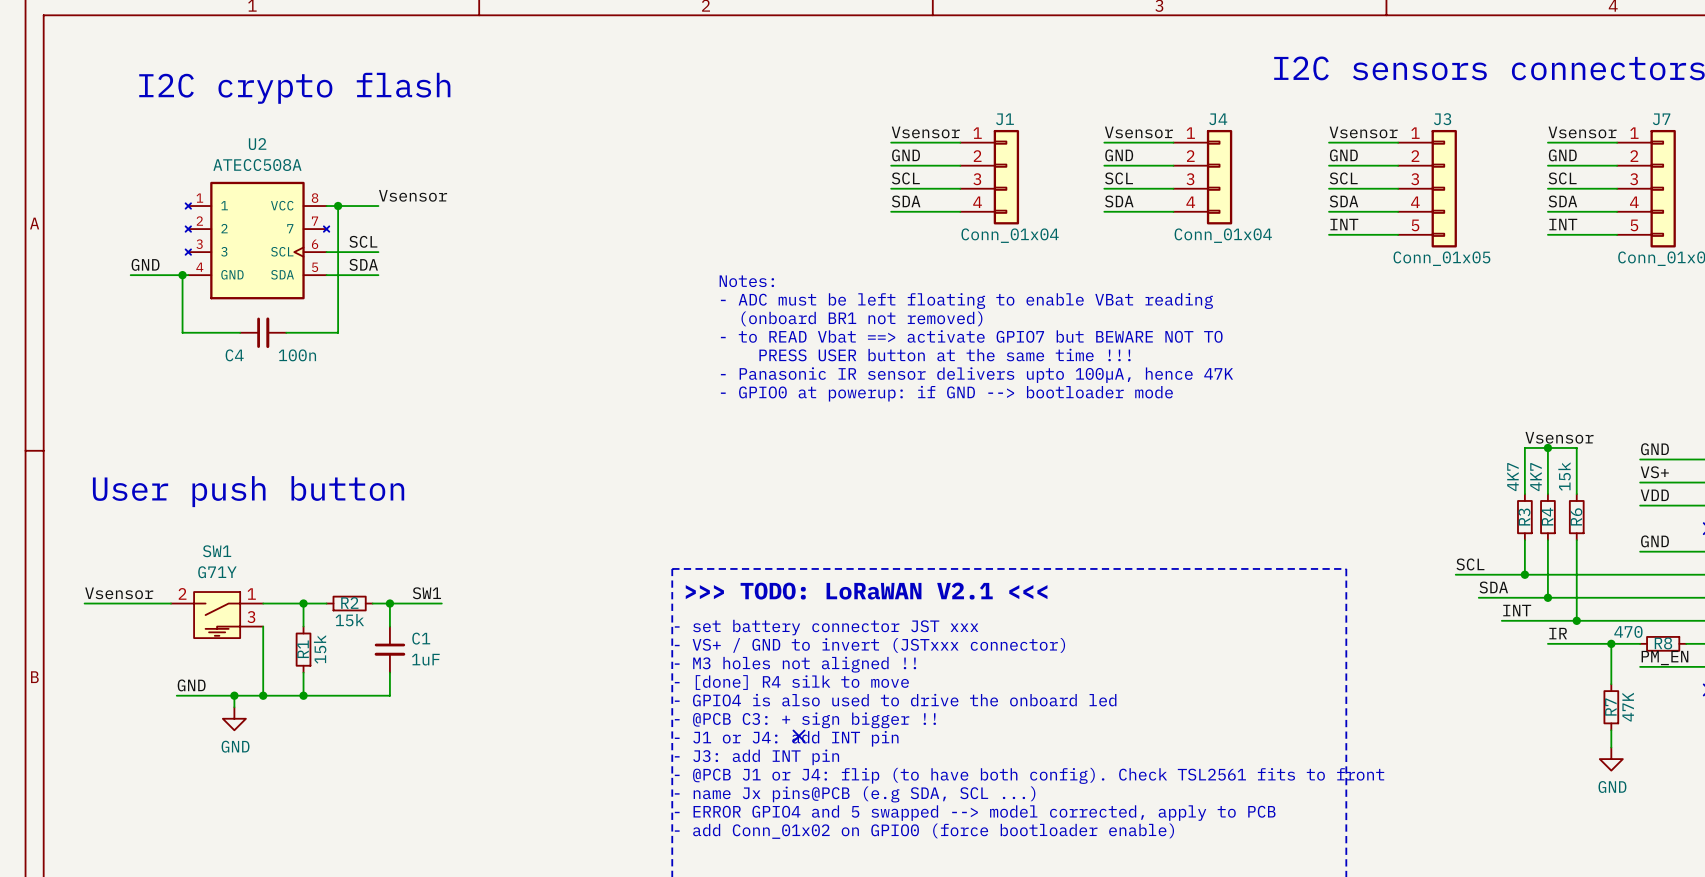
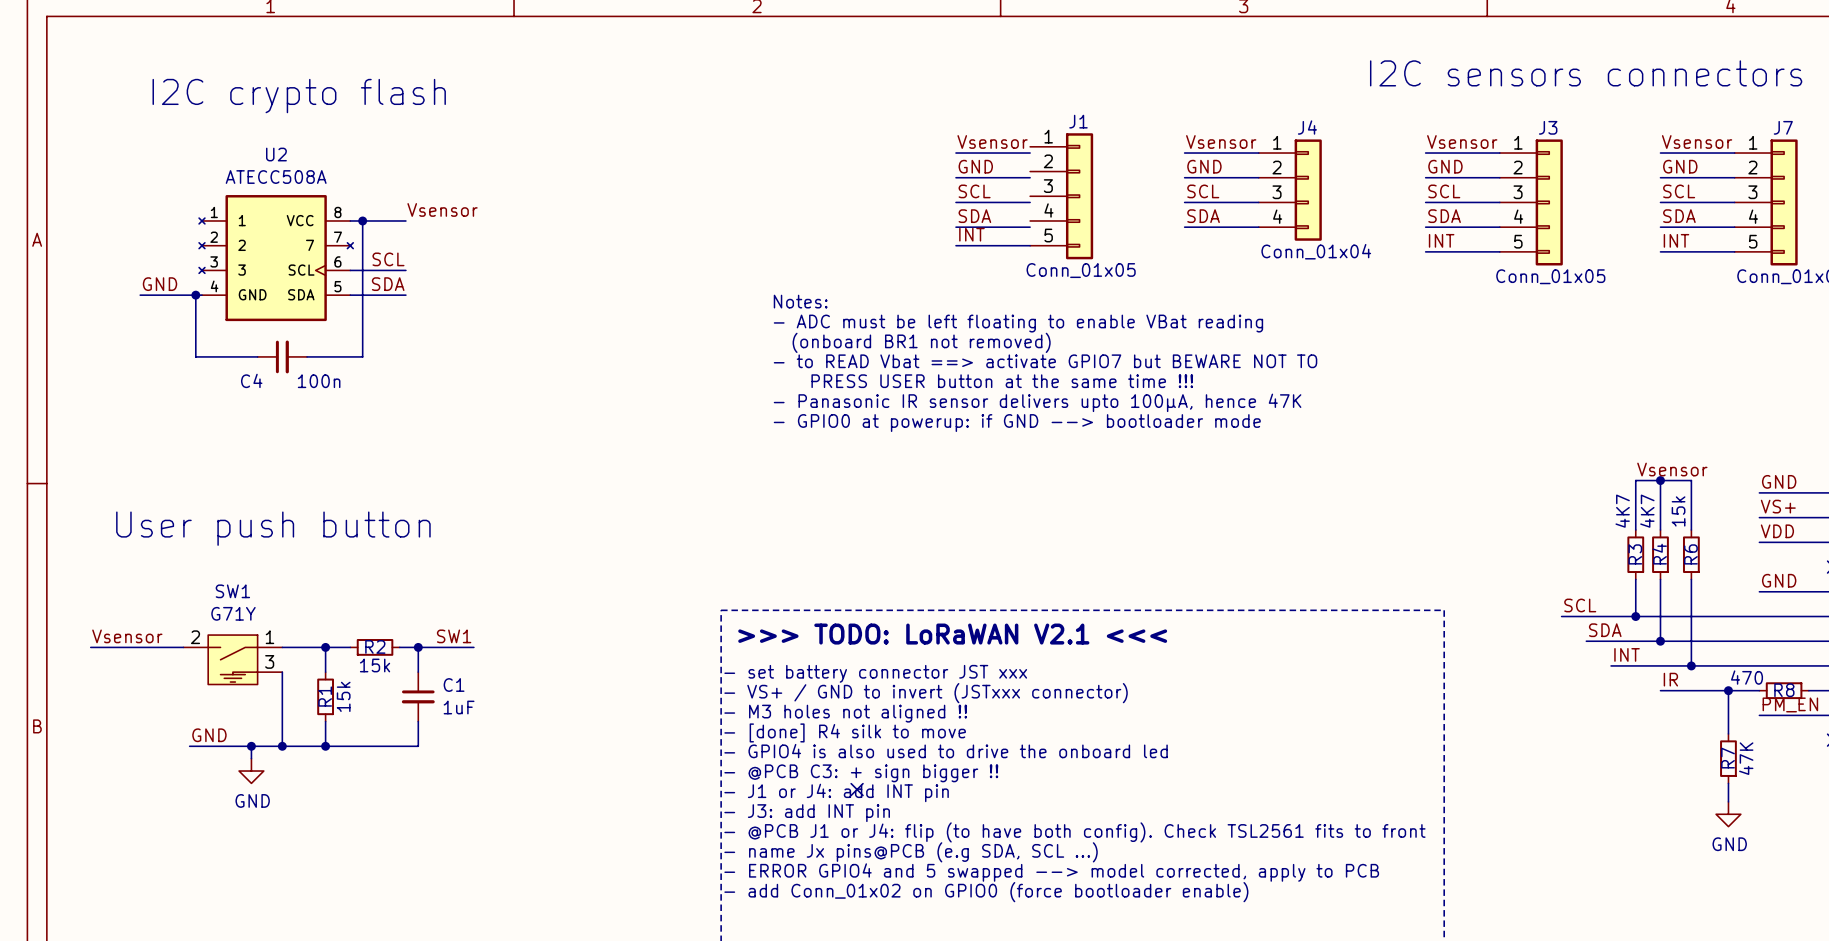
J1 symbol: [960, 129, 1020, 225] -> [1030, 133, 1094, 260]
label: none -> INT (971, 234)
wire: none -> (955, 245) (1030, 245)
J1 value: Conn_01x04 (1010, 235) -> Conn_01x05 (1081, 270)

